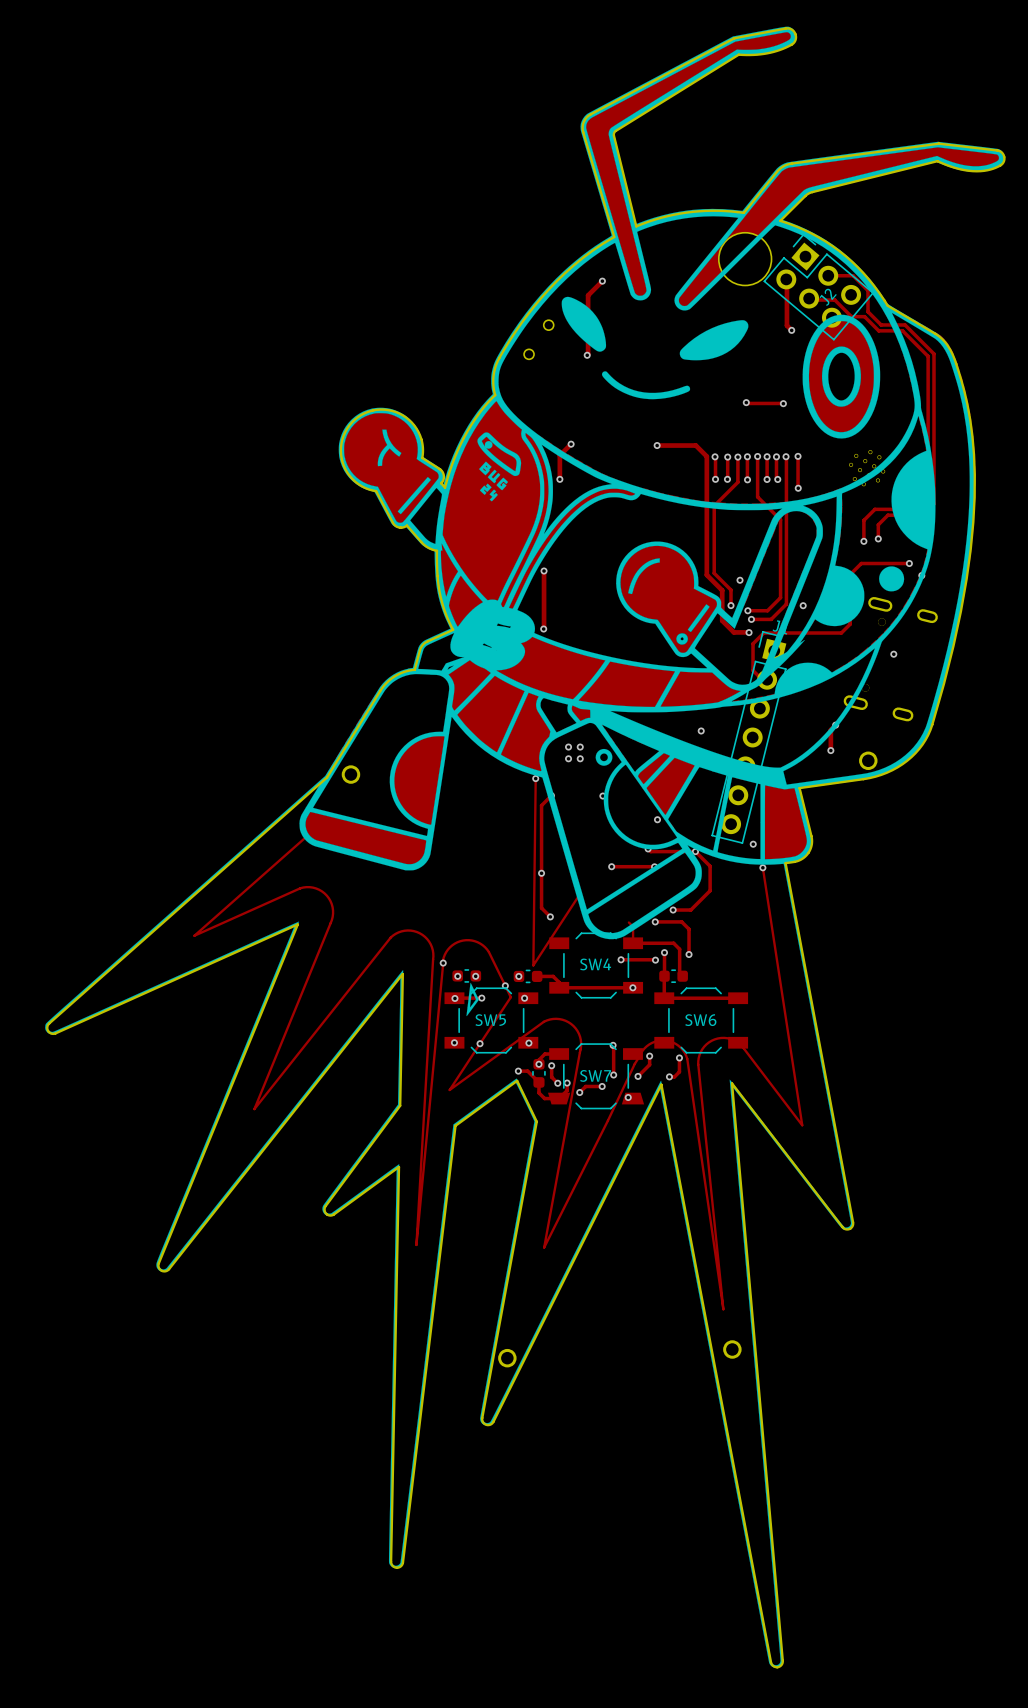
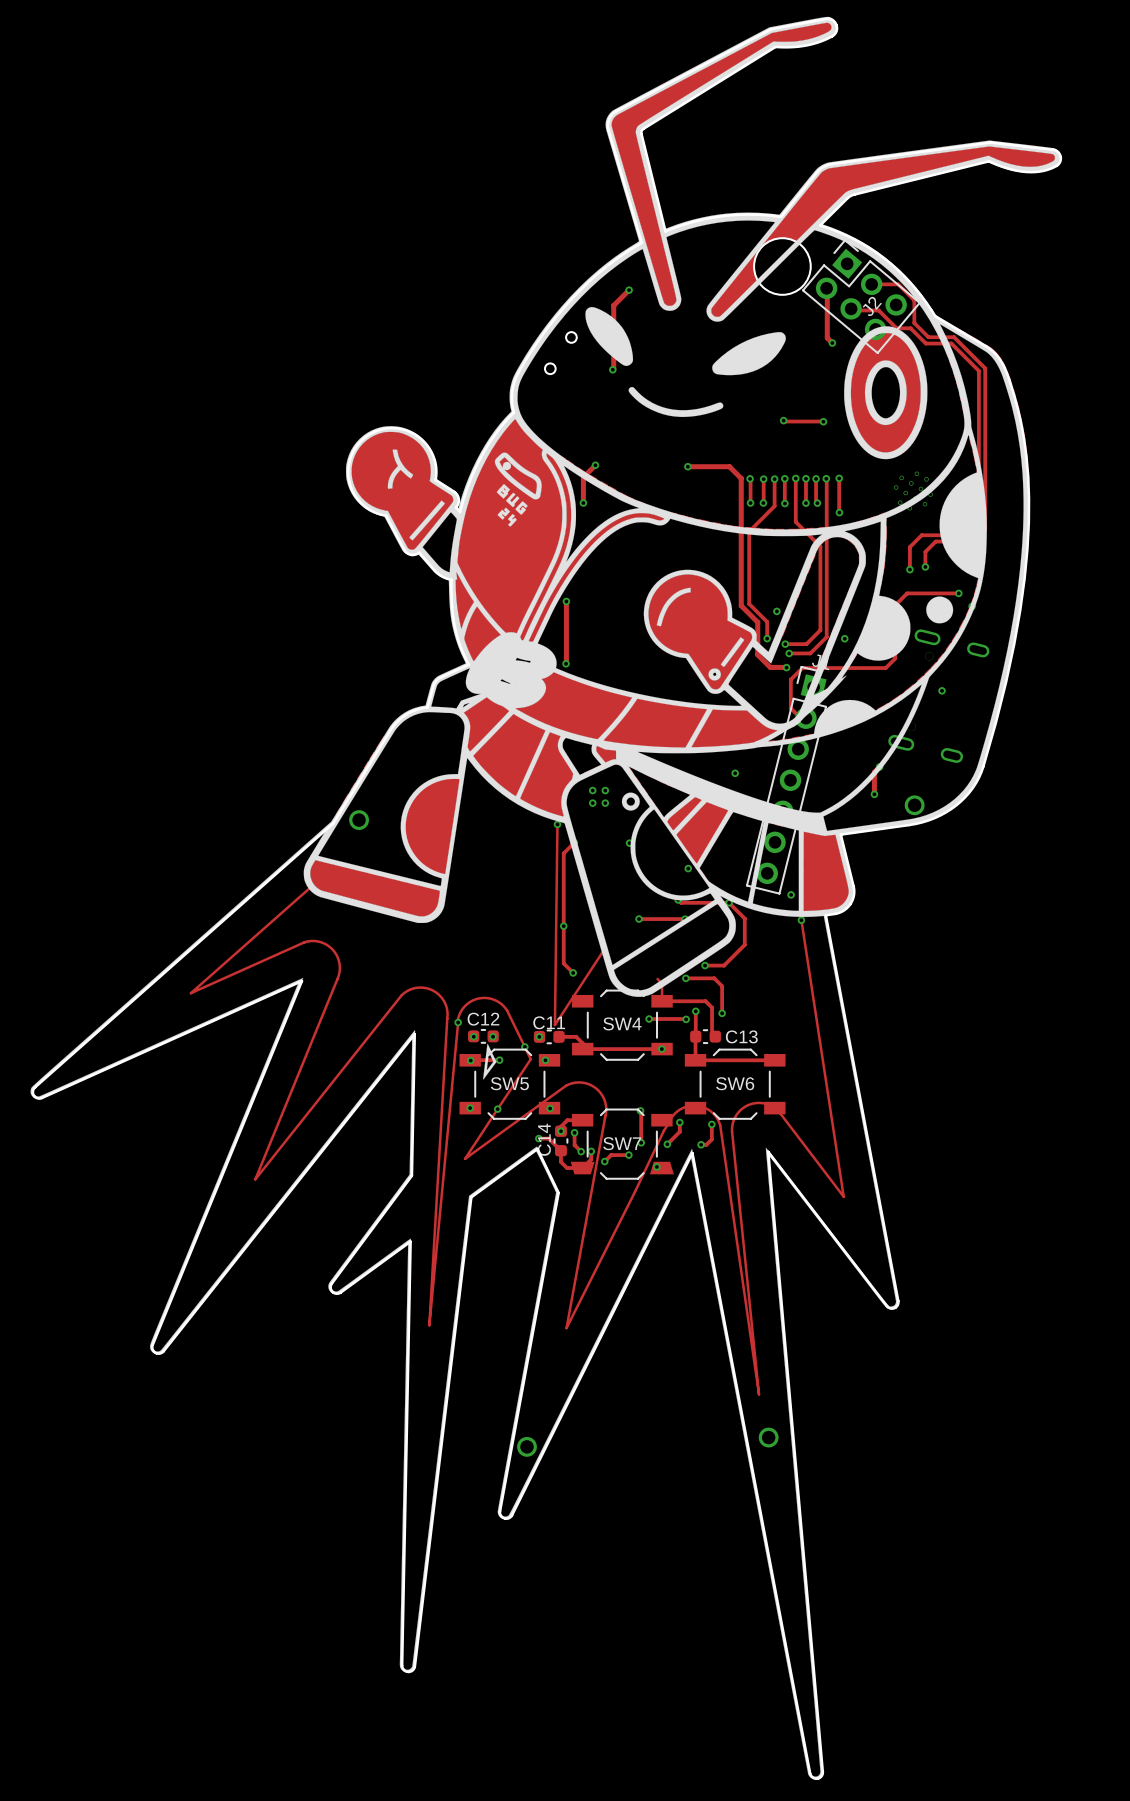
C12 name: none -> C12 (483, 1019)
C11 name: none -> C11 (549, 1022)
C13 name: none -> C13 (741, 1036)
C14 name: none -> C14 (544, 1139)

